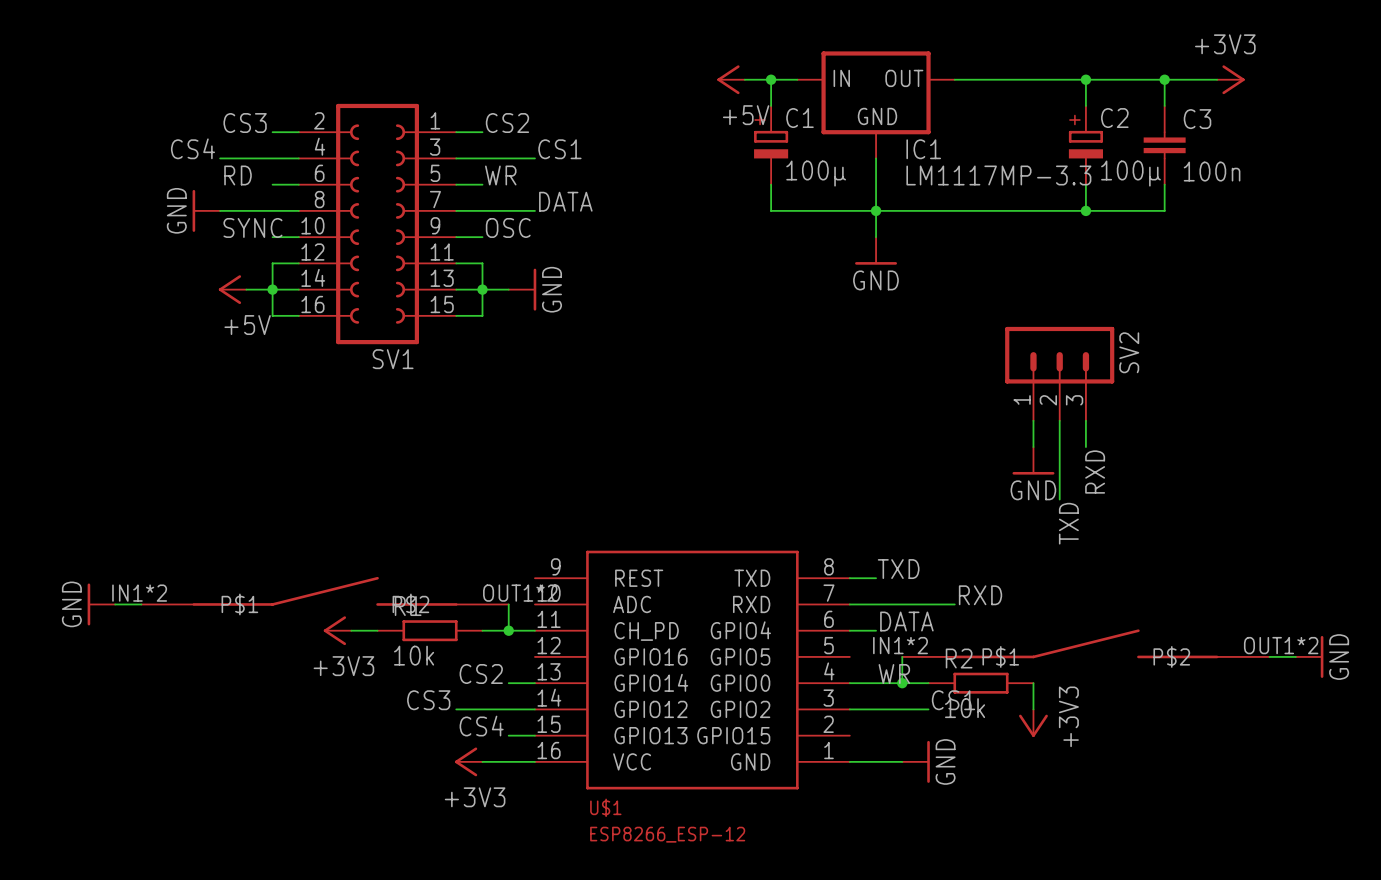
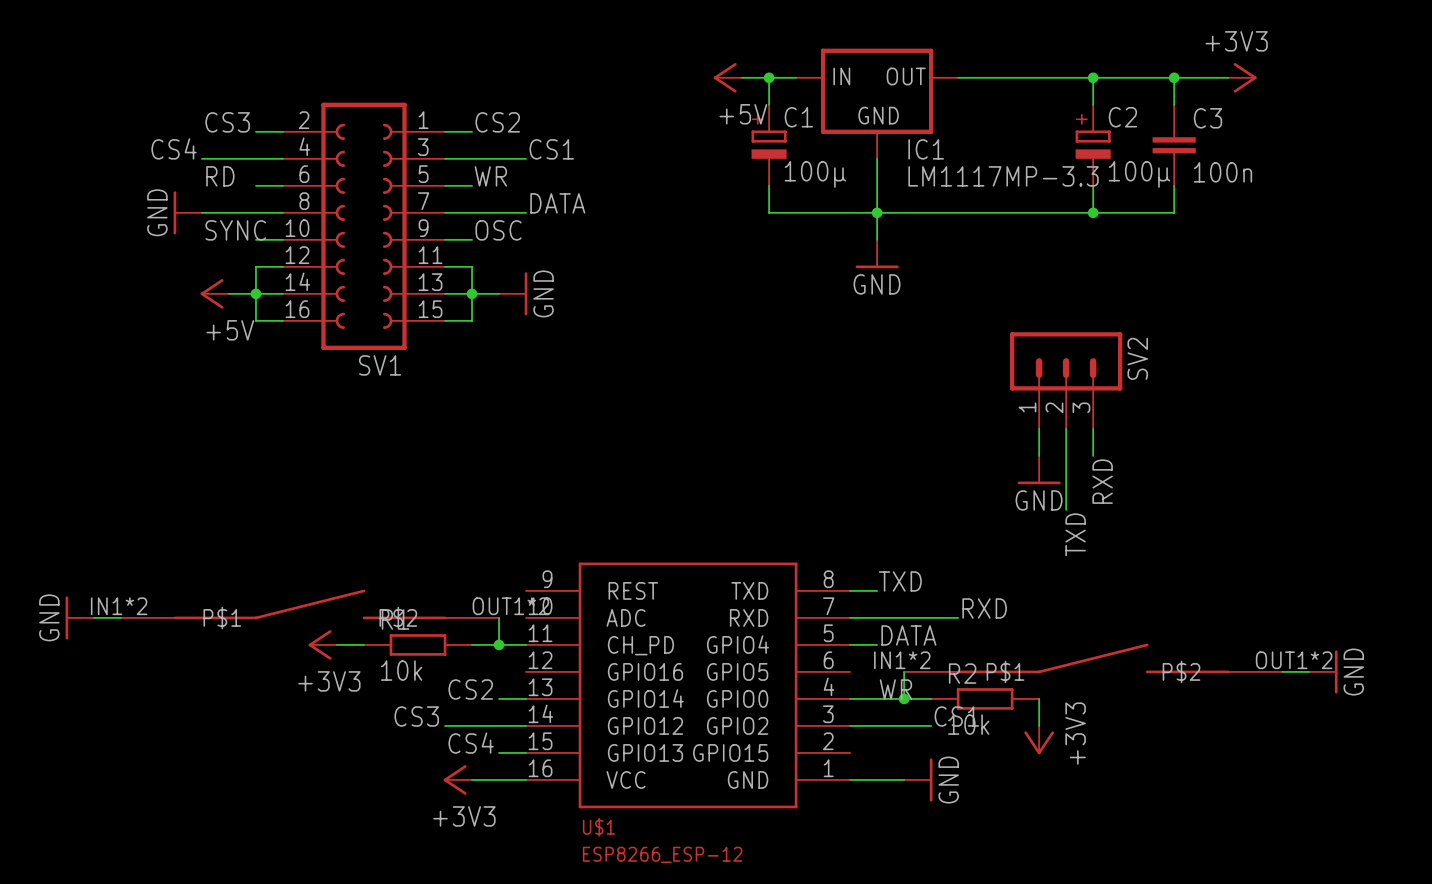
U$1 pin number: 6 (828, 619) -> 5 (828, 633)
U$1 pin number: 5 (828, 645) -> 6 (828, 660)

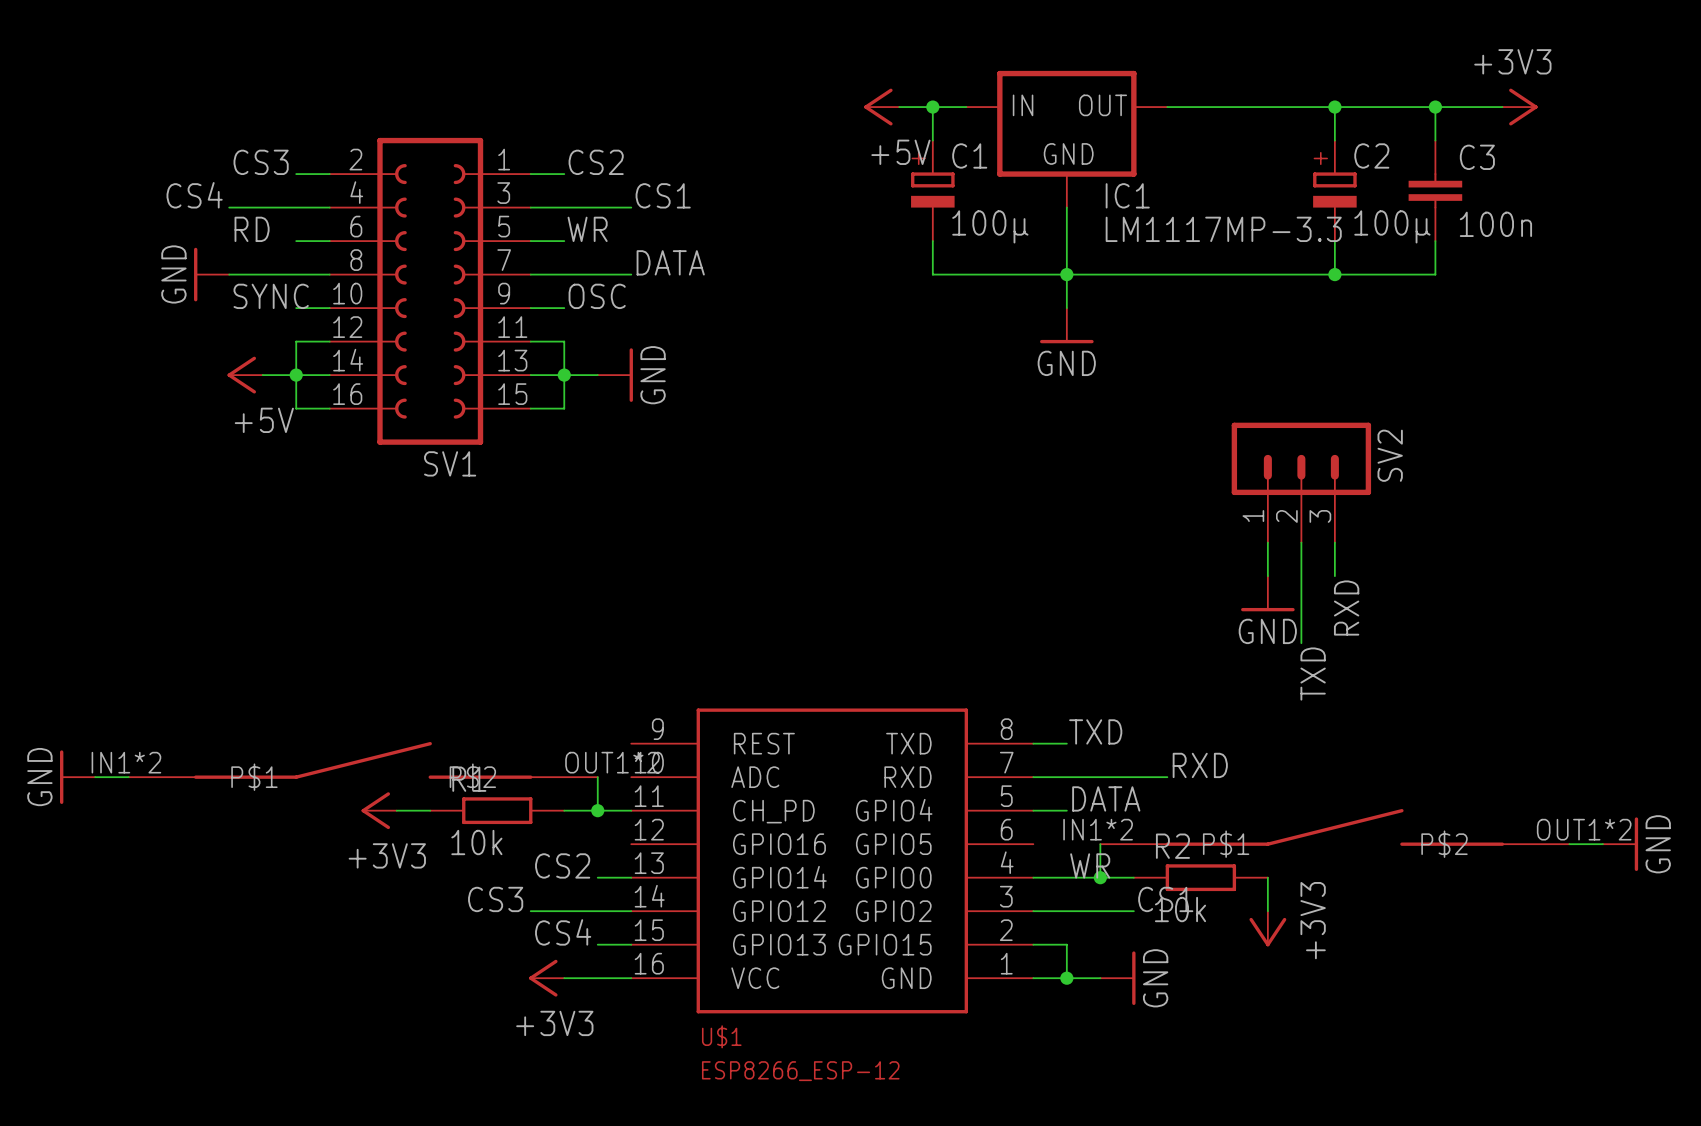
wire: none -> (1033, 944) (1066, 944) (1066, 978)
junction: none -> (1066, 978)

